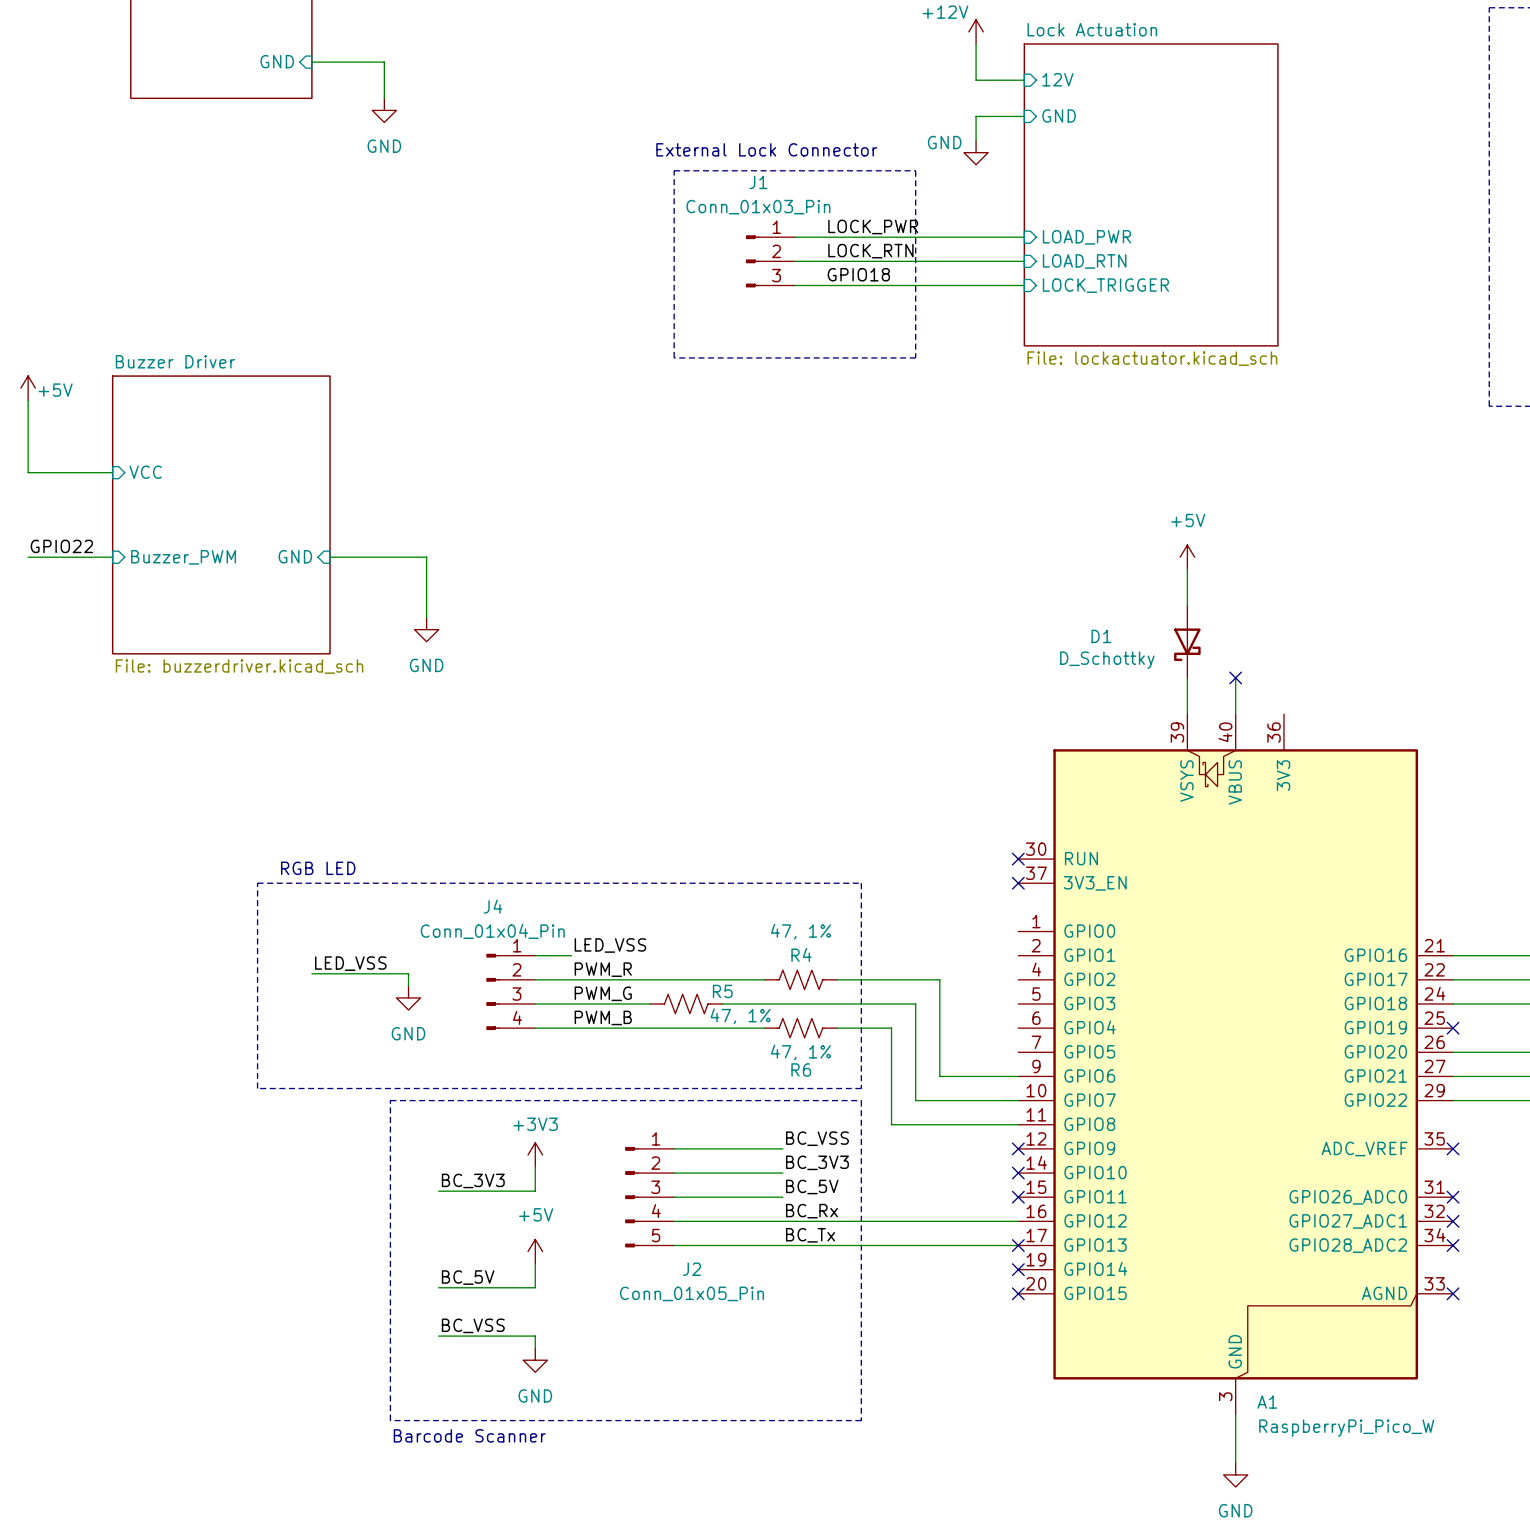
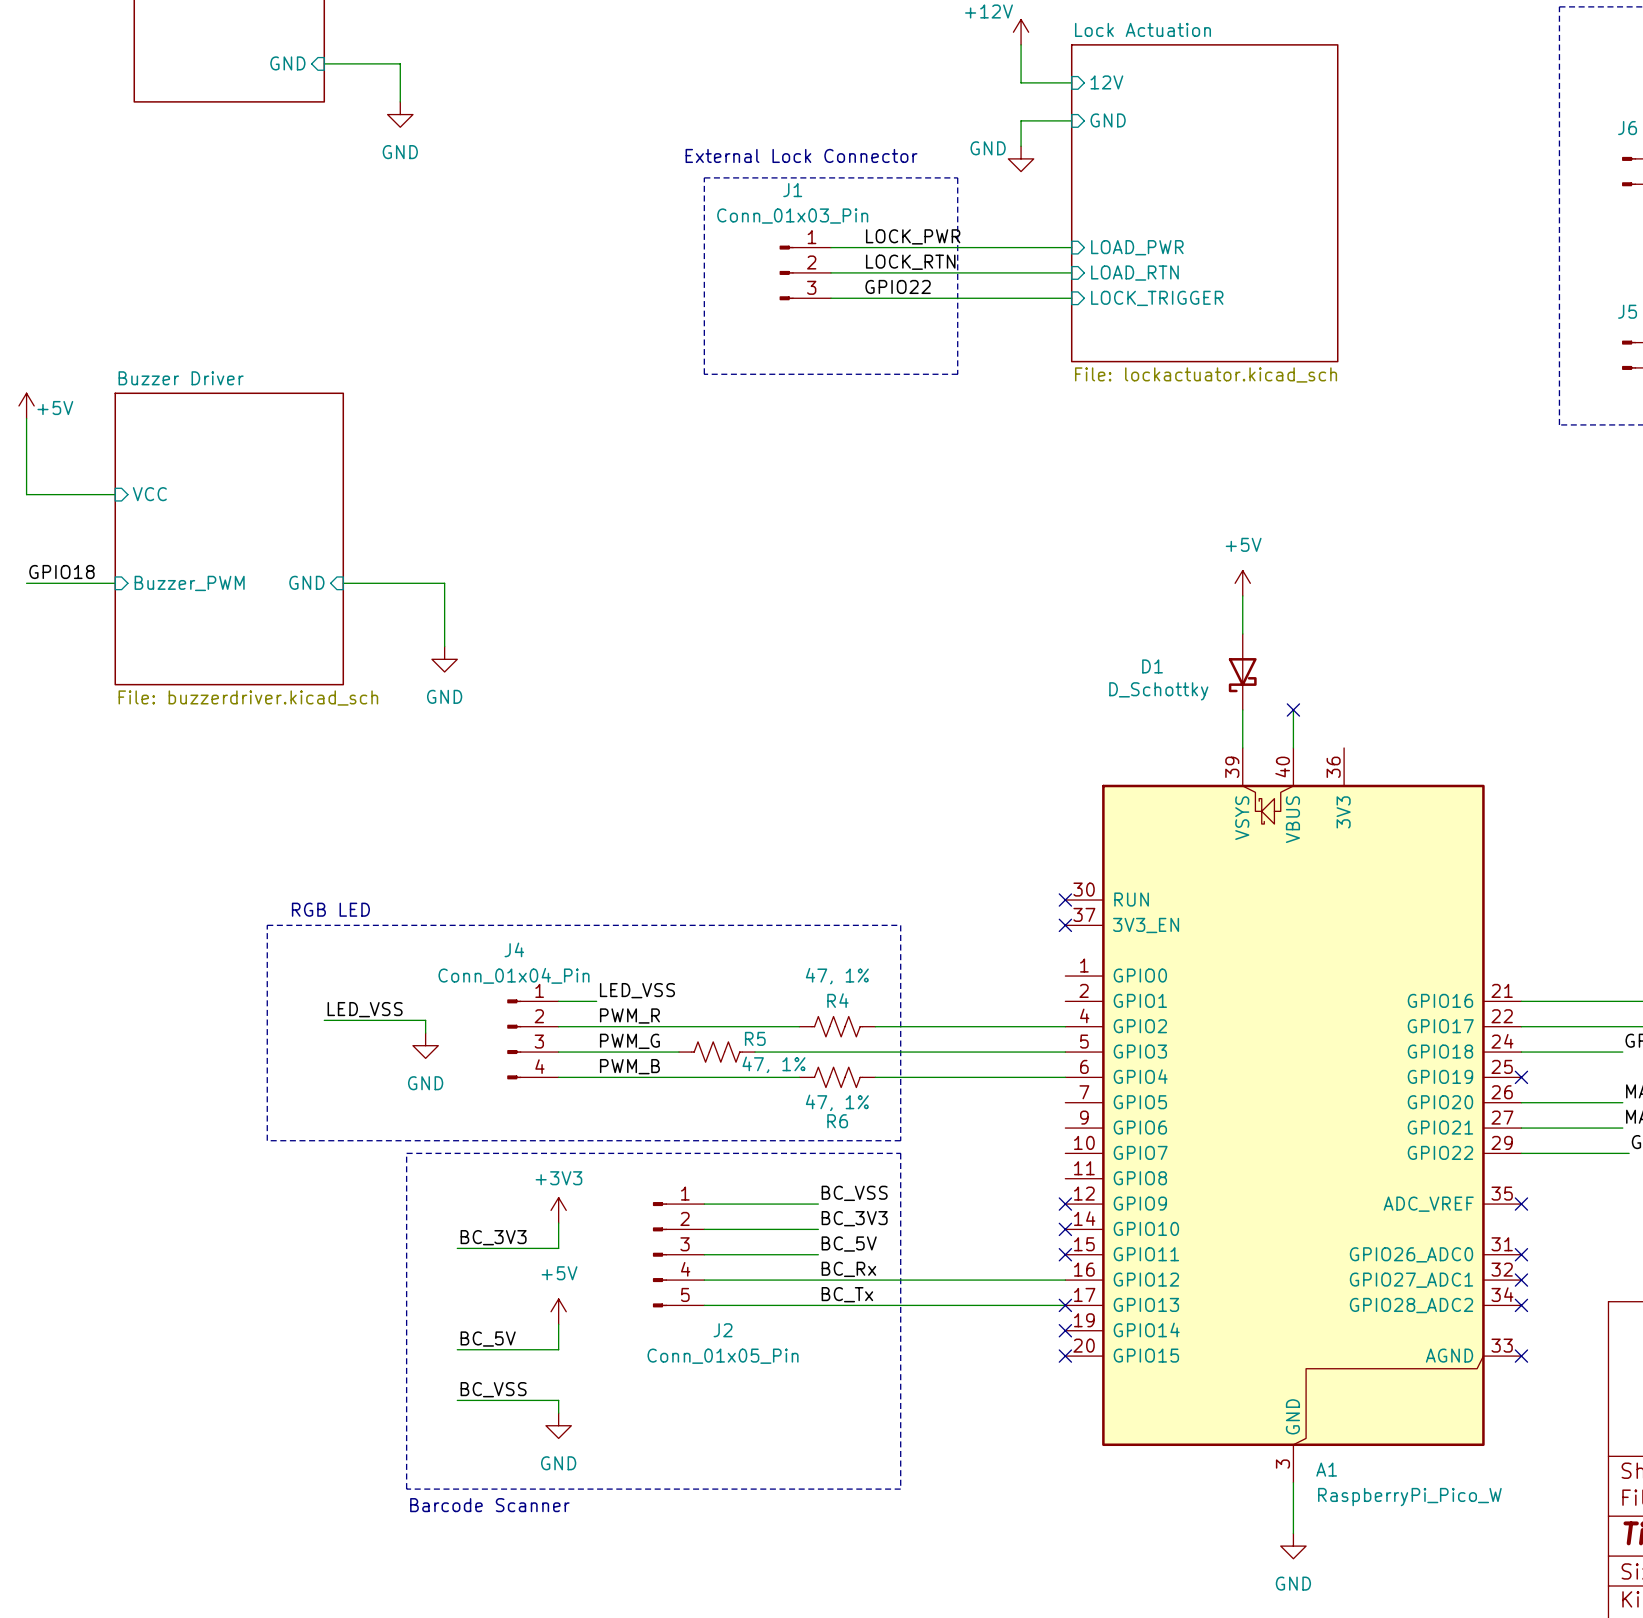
label: GPIO18 (858, 274) -> GPIO22 (898, 286)
label: GPIO22 (61, 546) -> GPIO18 (61, 572)
wire: (939, 979) (939, 1076) (1018, 1076) -> (983, 1026) (1065, 1026)
wire: (915, 1003) (915, 1100) (1018, 1100) -> (957, 1052) (1065, 1052)
wire: (891, 1028) (891, 1124) (1018, 1124) -> (932, 1077) (1065, 1077)

